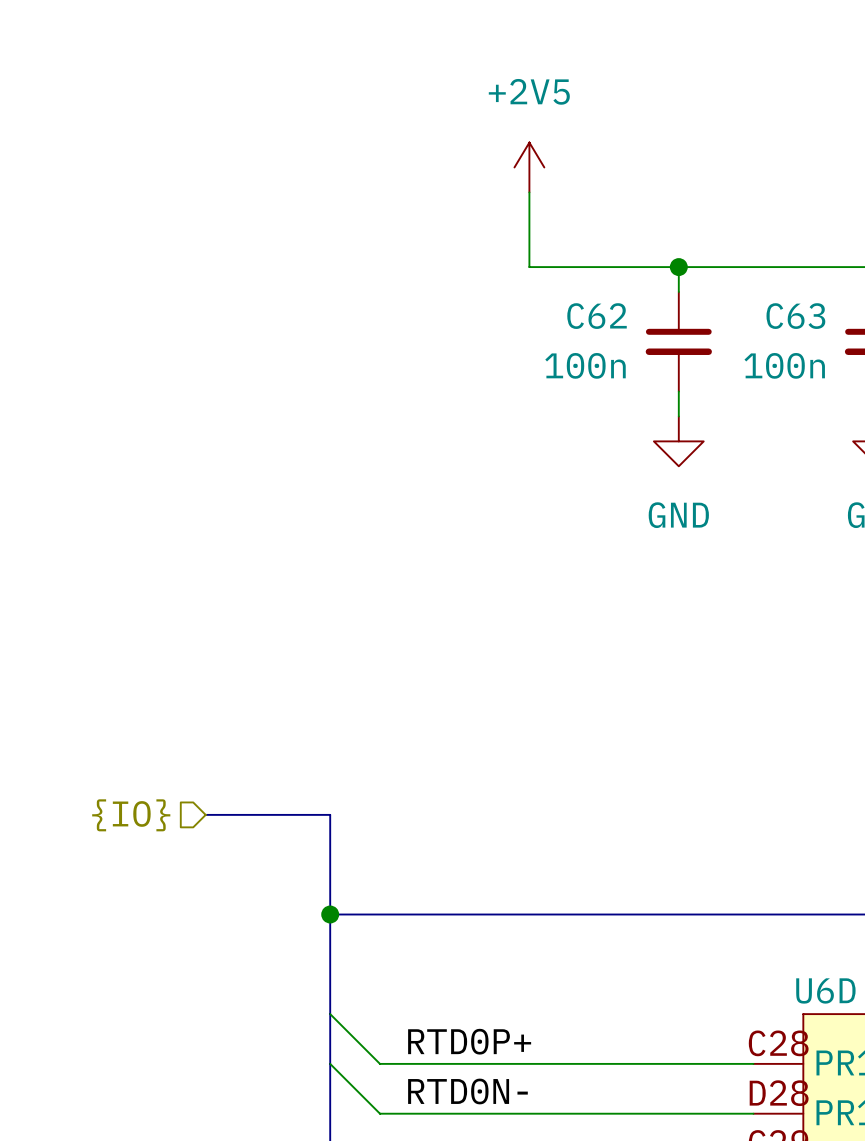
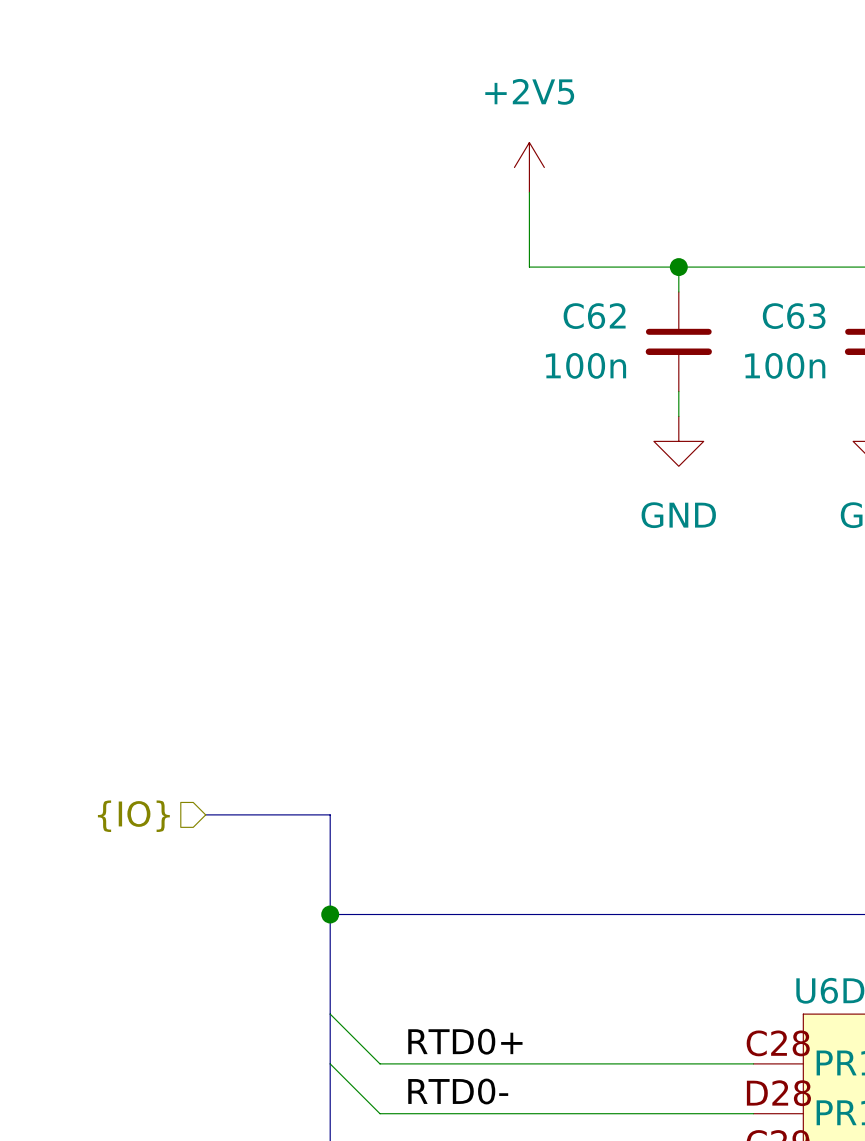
label: RTD0P+ (469, 1041) -> RTD0+ (465, 1041)
label: RTD0N- (467, 1091) -> RTD0- (458, 1091)

